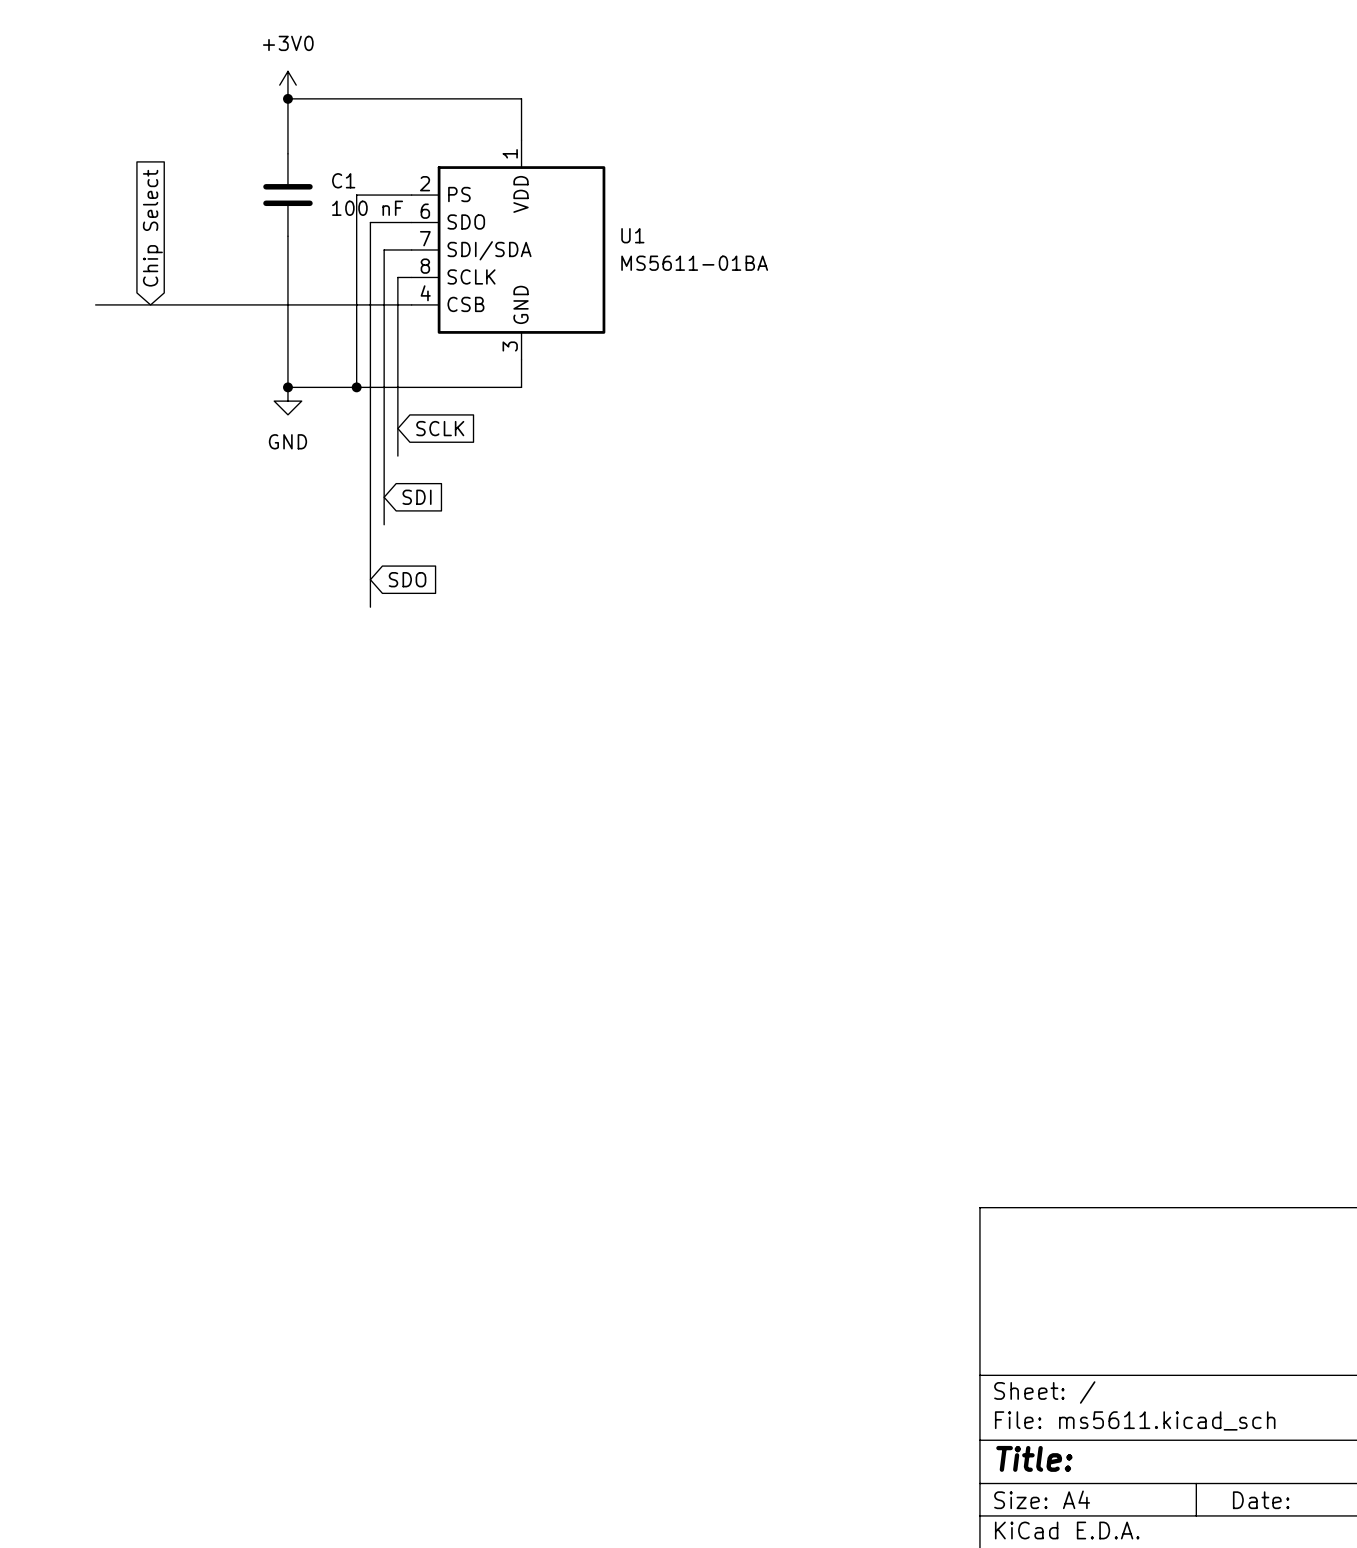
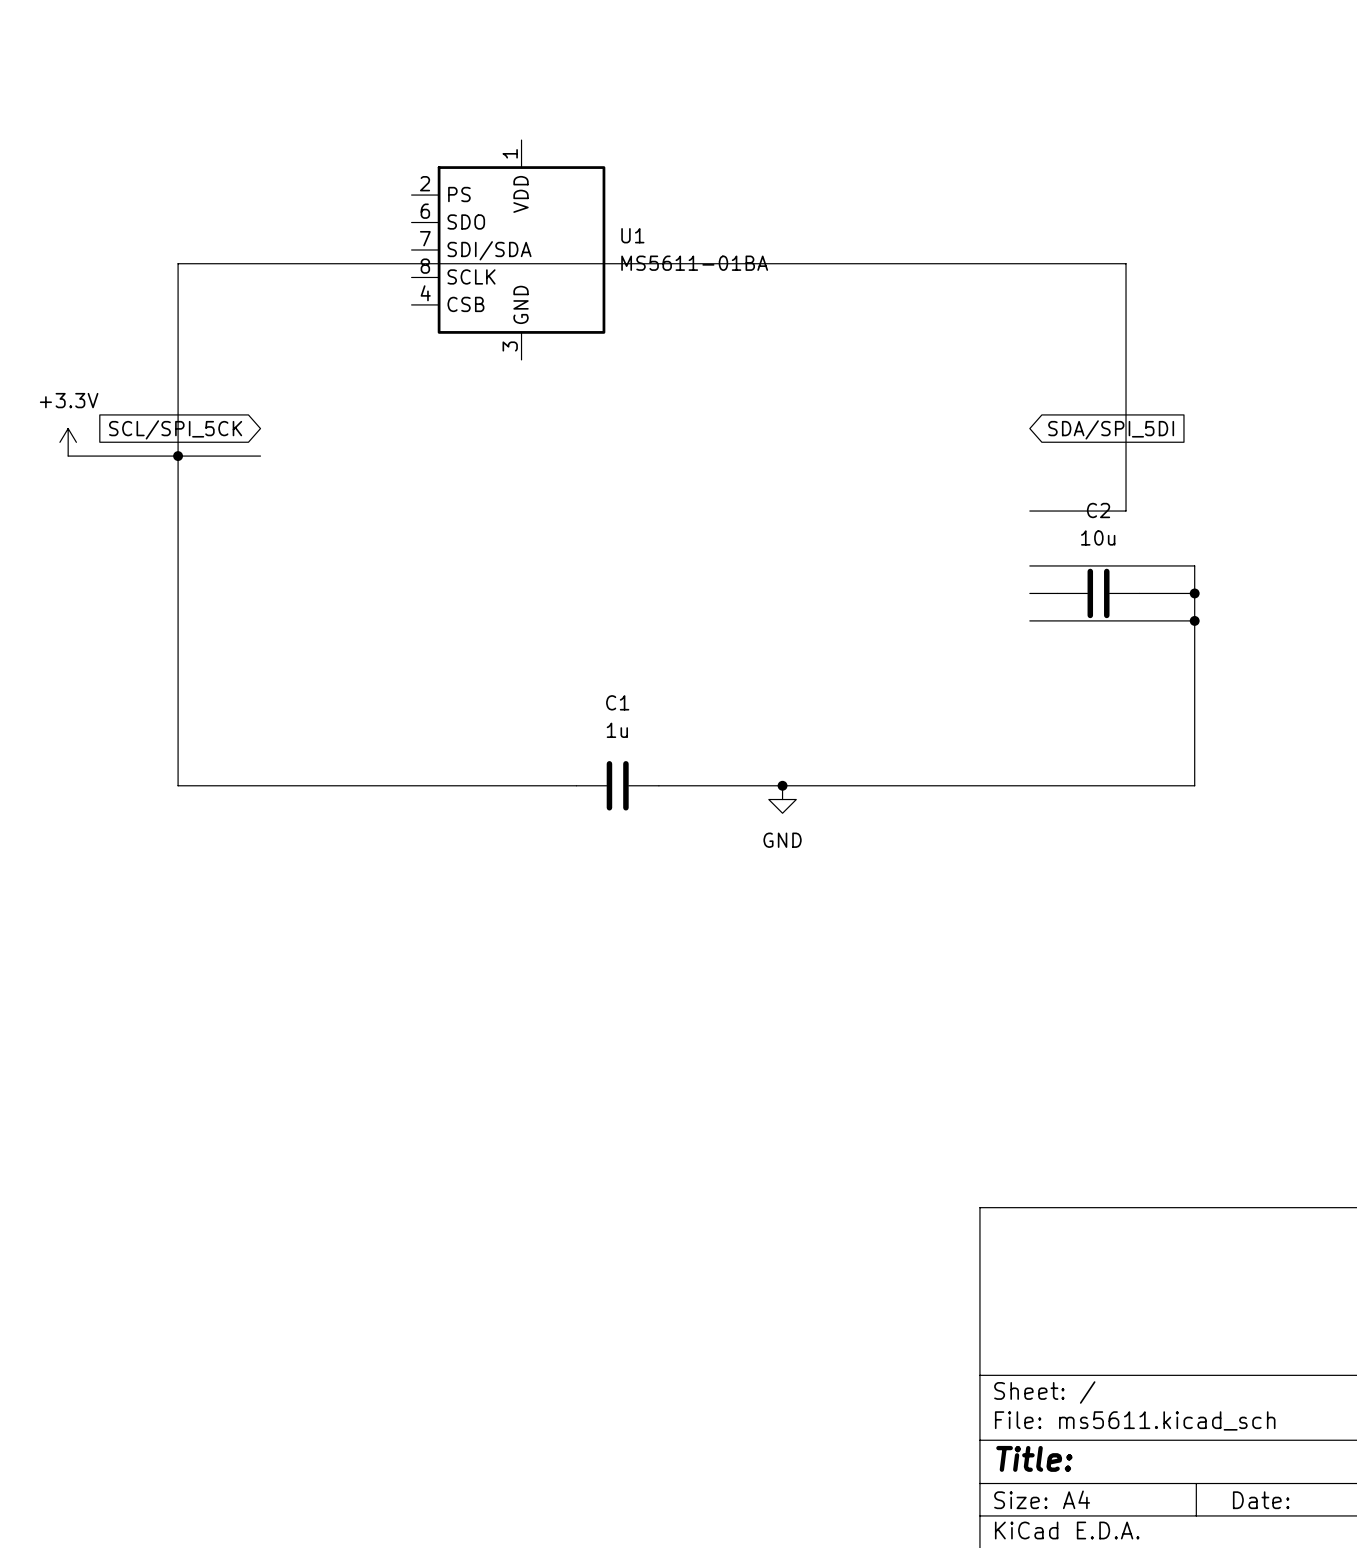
power symbol: +3V0 (287, 85) -> none
junction: (287, 98) -> none
wire: (521, 140) (521, 98) (287, 98) (287, 153) -> none
C1 name position: C1 (343, 180) -> C1 (617, 702)
C1 rotation: 0° (287, 195) -> 90° clockwise (617, 785)
C1 position: (287, 195) -> (617, 785)
wire: (411, 195) (356, 195) (356, 387) -> none
C1 value: 100 nF (367, 208) -> 1u (617, 730)
wire: (411, 222) (370, 222) (370, 607) -> none
global label: Chip Select (152, 228) -> none
wire: (287, 236) (287, 387) (521, 387) (521, 359) -> none
wire: (411, 249) (384, 249) (384, 524) -> none
wire: (411, 277) (397, 277) (397, 456) -> none
wire: (95, 304) (411, 304) -> none
junction: (287, 387) -> none
junction: (356, 387) -> none
power symbol: GND (287, 401) -> none
global label: SCLK (440, 428) -> none
global label: none -> SCL/SPI_5CK (175, 429)
global label: none -> SDA/SPI_5DI (1111, 429)
power symbol: none -> +3.3V (68, 442)
wire: none -> (68, 456) (260, 456)
junction: none -> (178, 456)
global label: SDI (417, 497) -> none
wire: none -> (1029, 511) (1126, 511) (1126, 263) (178, 263) (178, 785) (576, 785)
wire: none -> (1029, 565) (1194, 565) (1194, 785) (658, 785)
global label: SDO (407, 579) -> none
wire: none -> (1029, 593) (1057, 593)
C2: none -> 10u (1098, 593)
wire: none -> (1139, 593) (1194, 593)
junction: none -> (1194, 593)
wire: none -> (1029, 620) (1194, 620)
junction: none -> (1194, 620)
junction: none -> (782, 785)
power symbol: none -> GND (782, 799)

